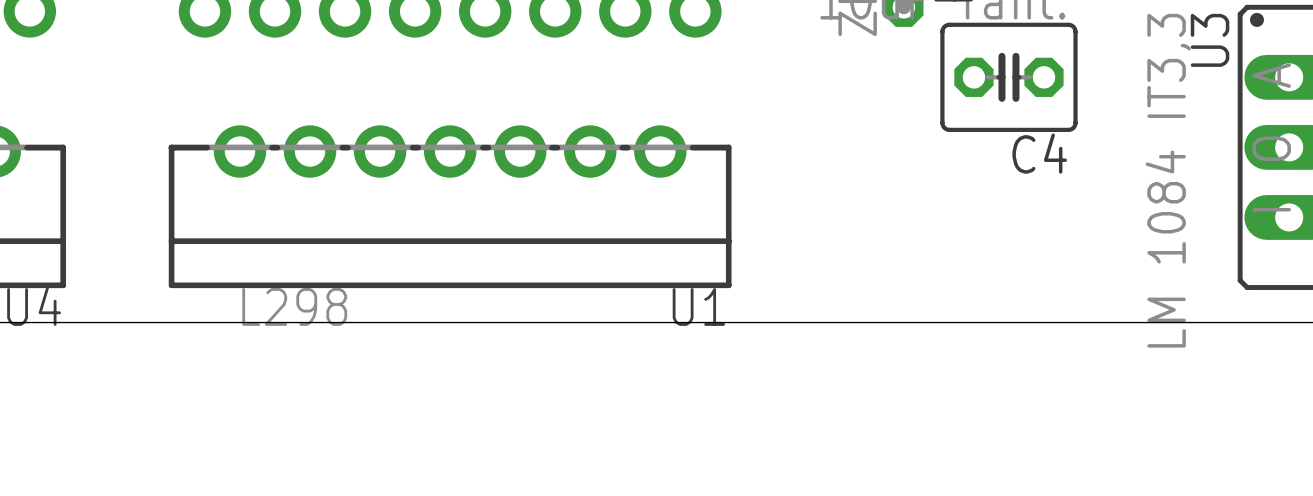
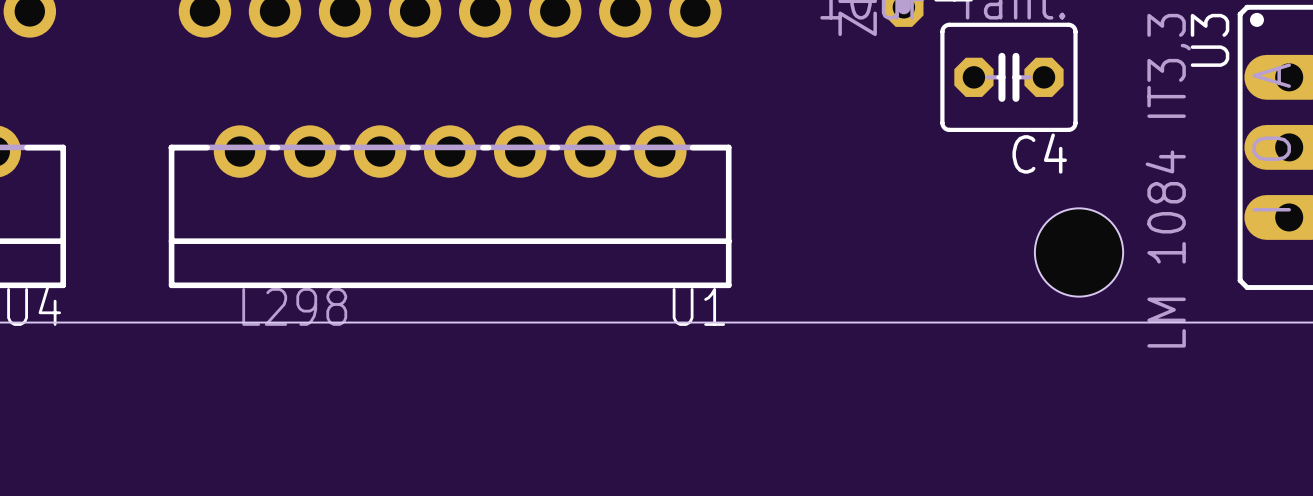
hole: none -> (1079, 252)

